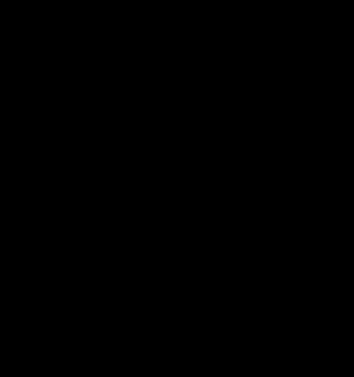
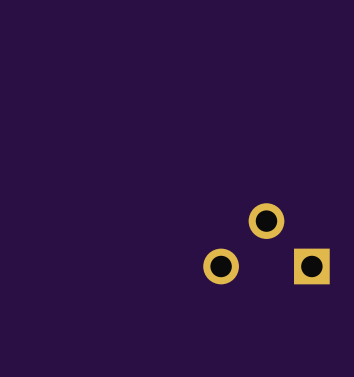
part: none -> (266, 243)

